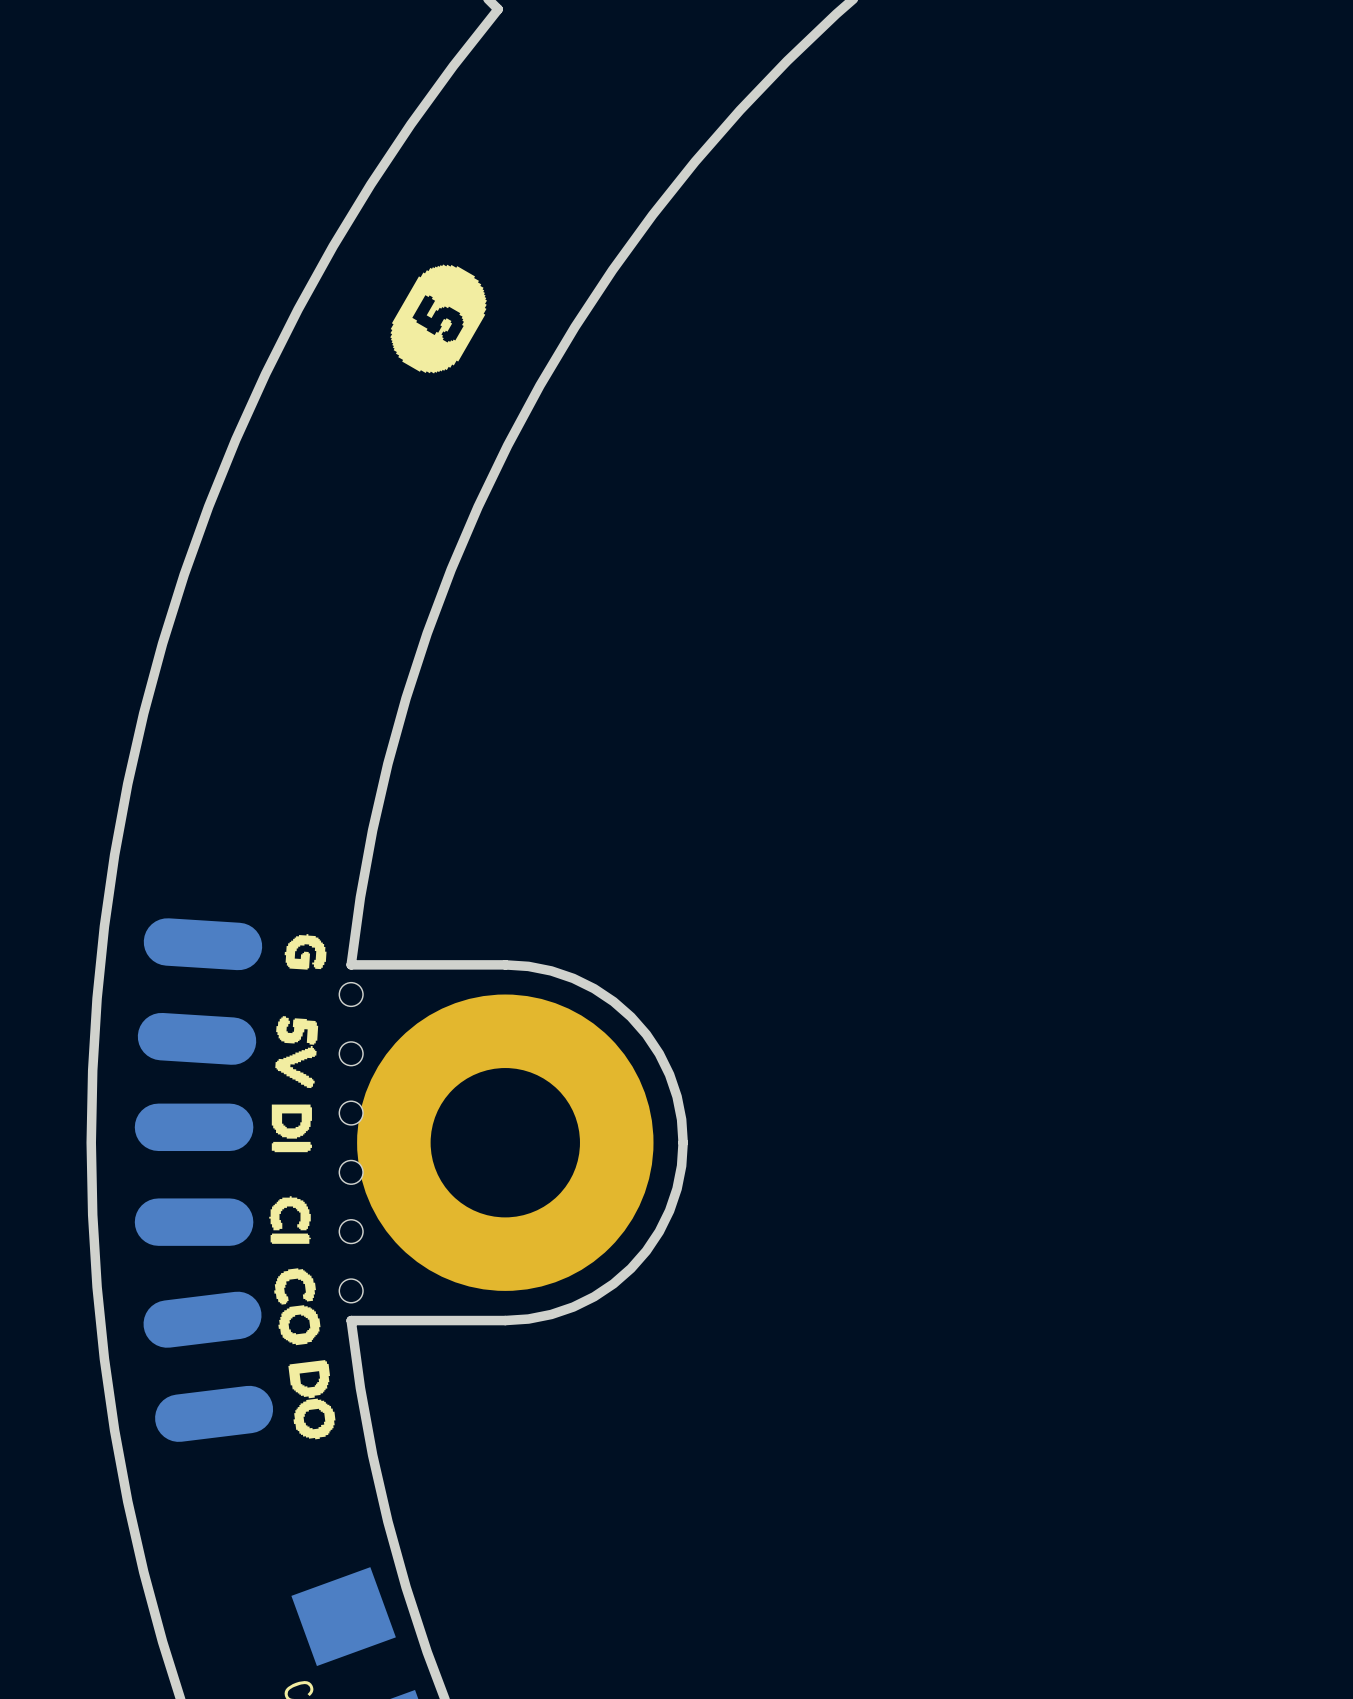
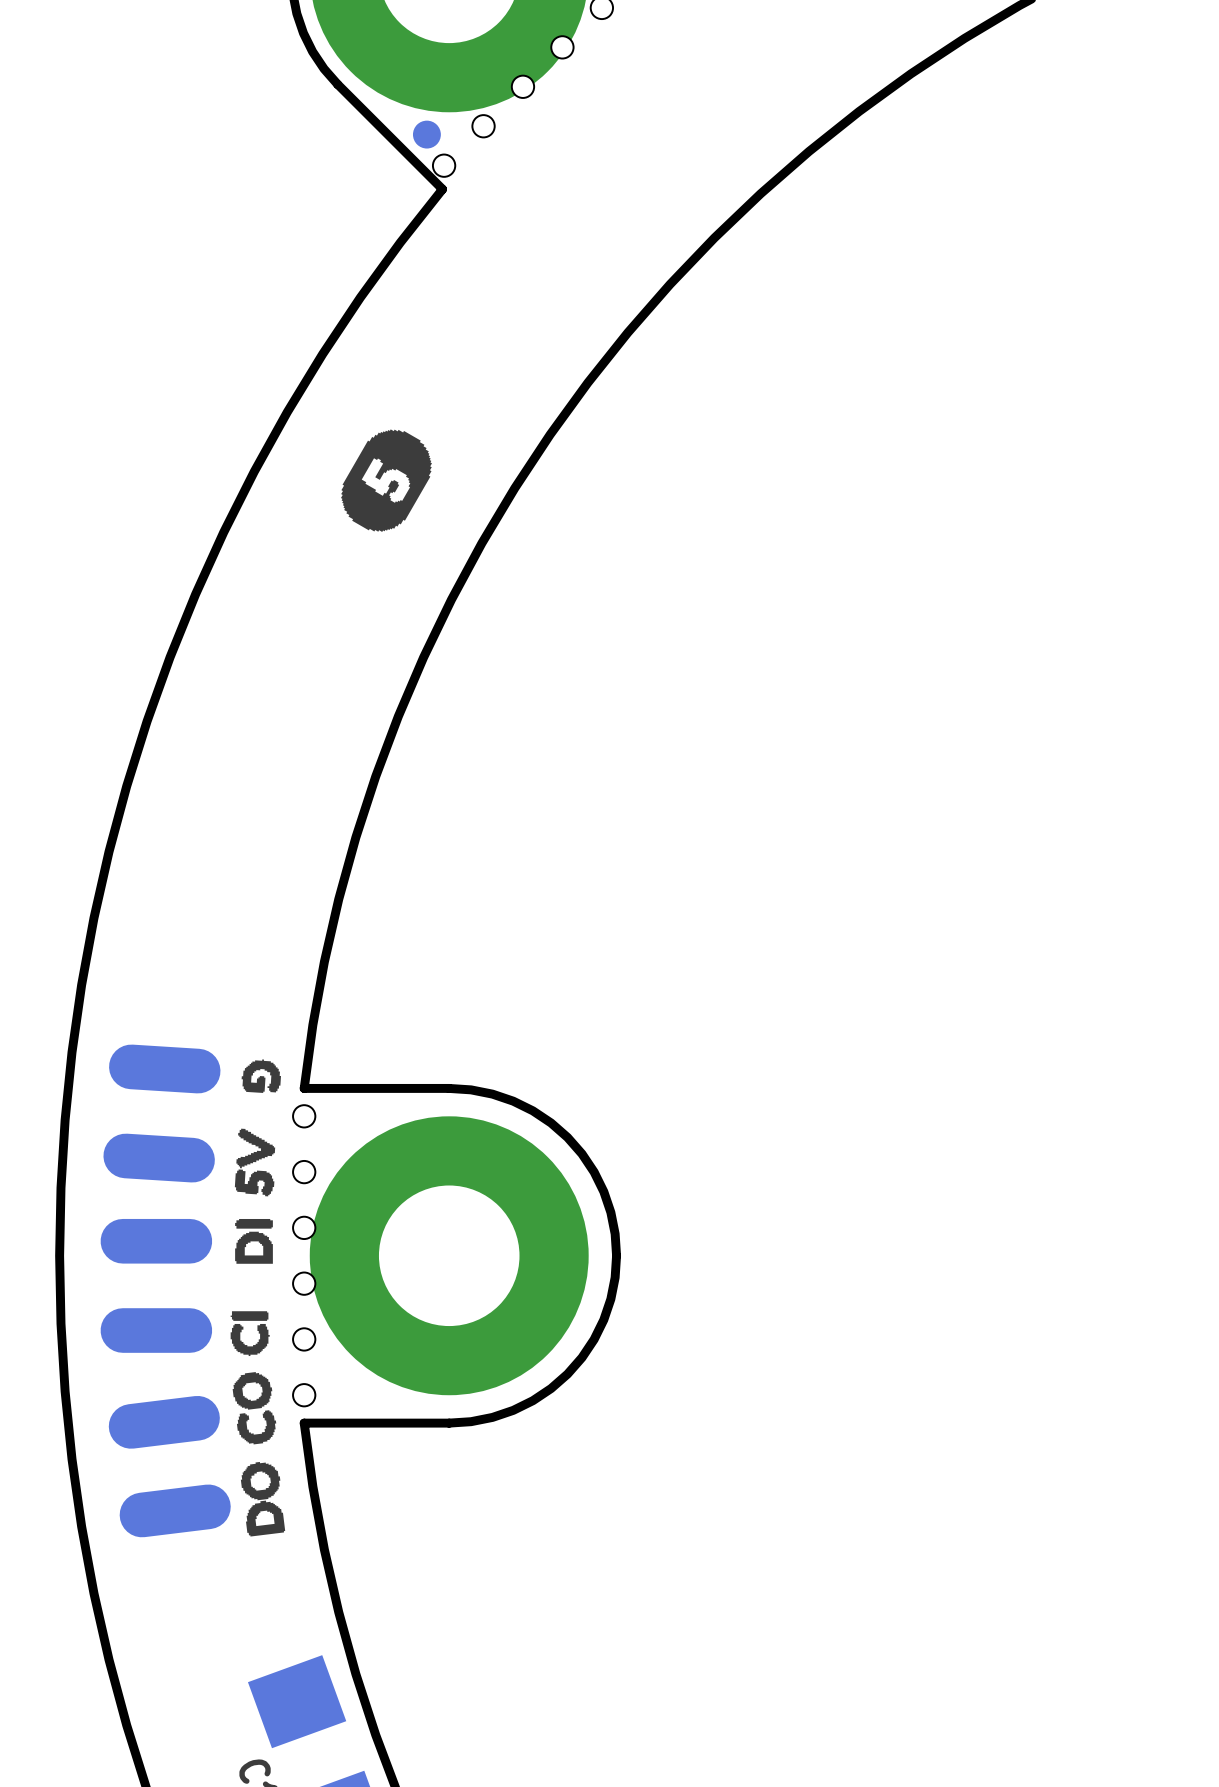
drawing shape: [275, 1016, 319, 1089] -> [234, 1128, 276, 1197]
drawing shape: [271, 1104, 312, 1153] -> [235, 1218, 273, 1264]
drawing shape: [269, 1196, 311, 1244] -> [230, 1311, 270, 1357]
drawing shape: [274, 1268, 321, 1346] -> [232, 1372, 277, 1445]
drawing shape: [288, 1360, 336, 1440] -> [240, 1461, 286, 1537]

